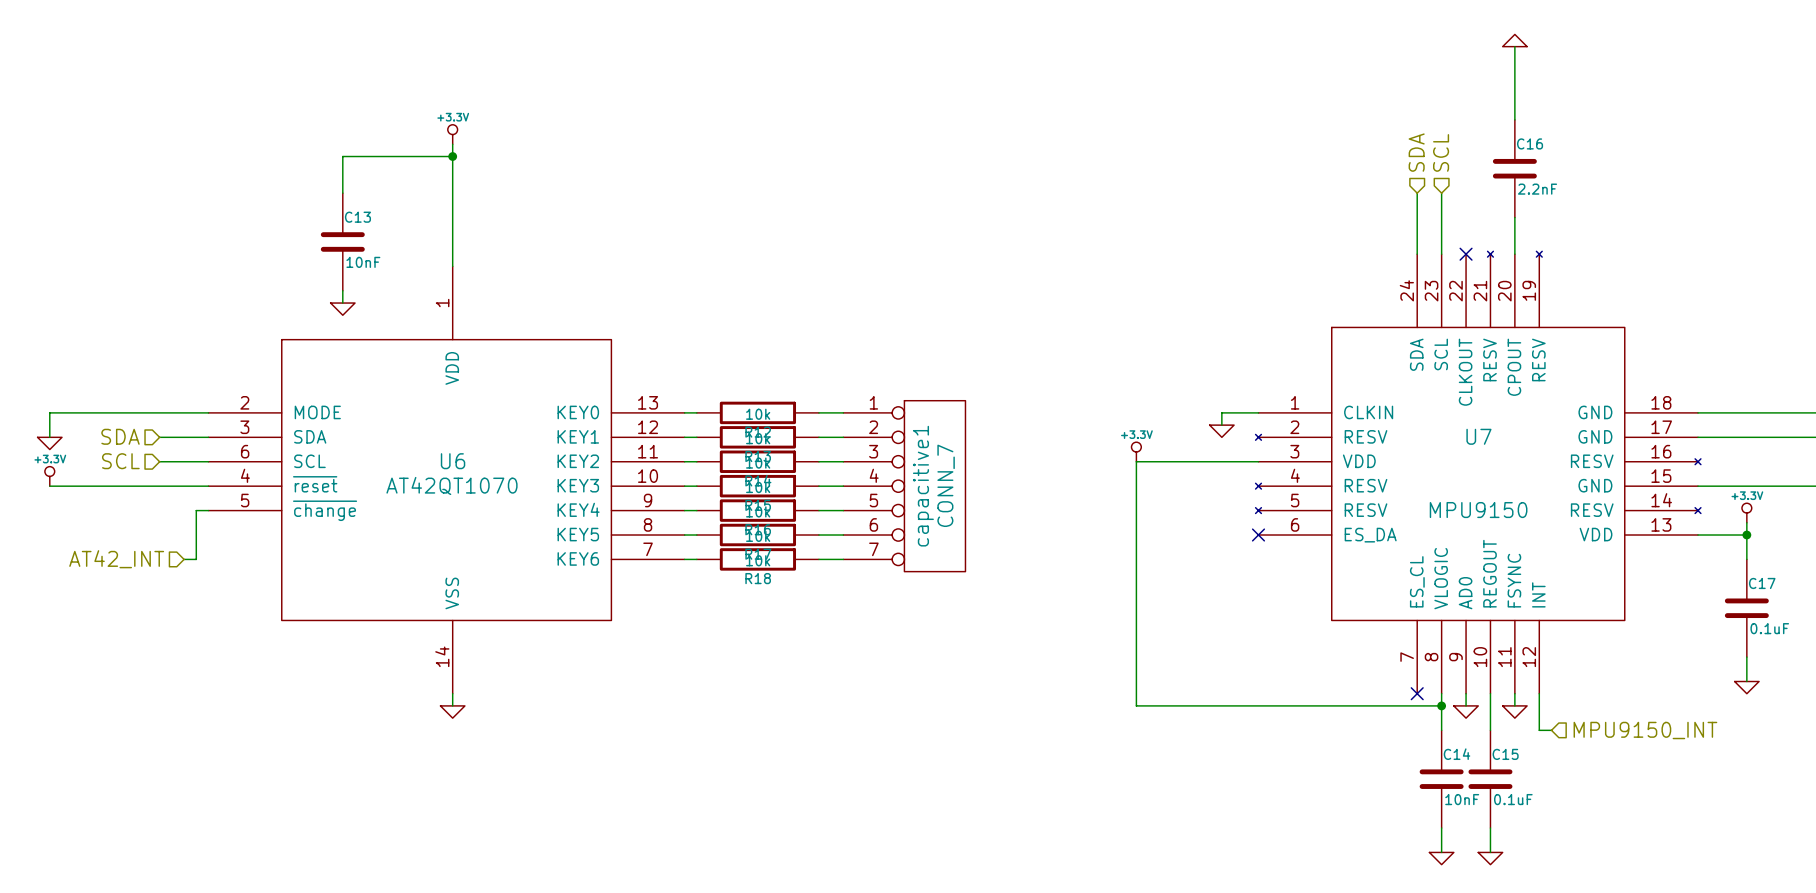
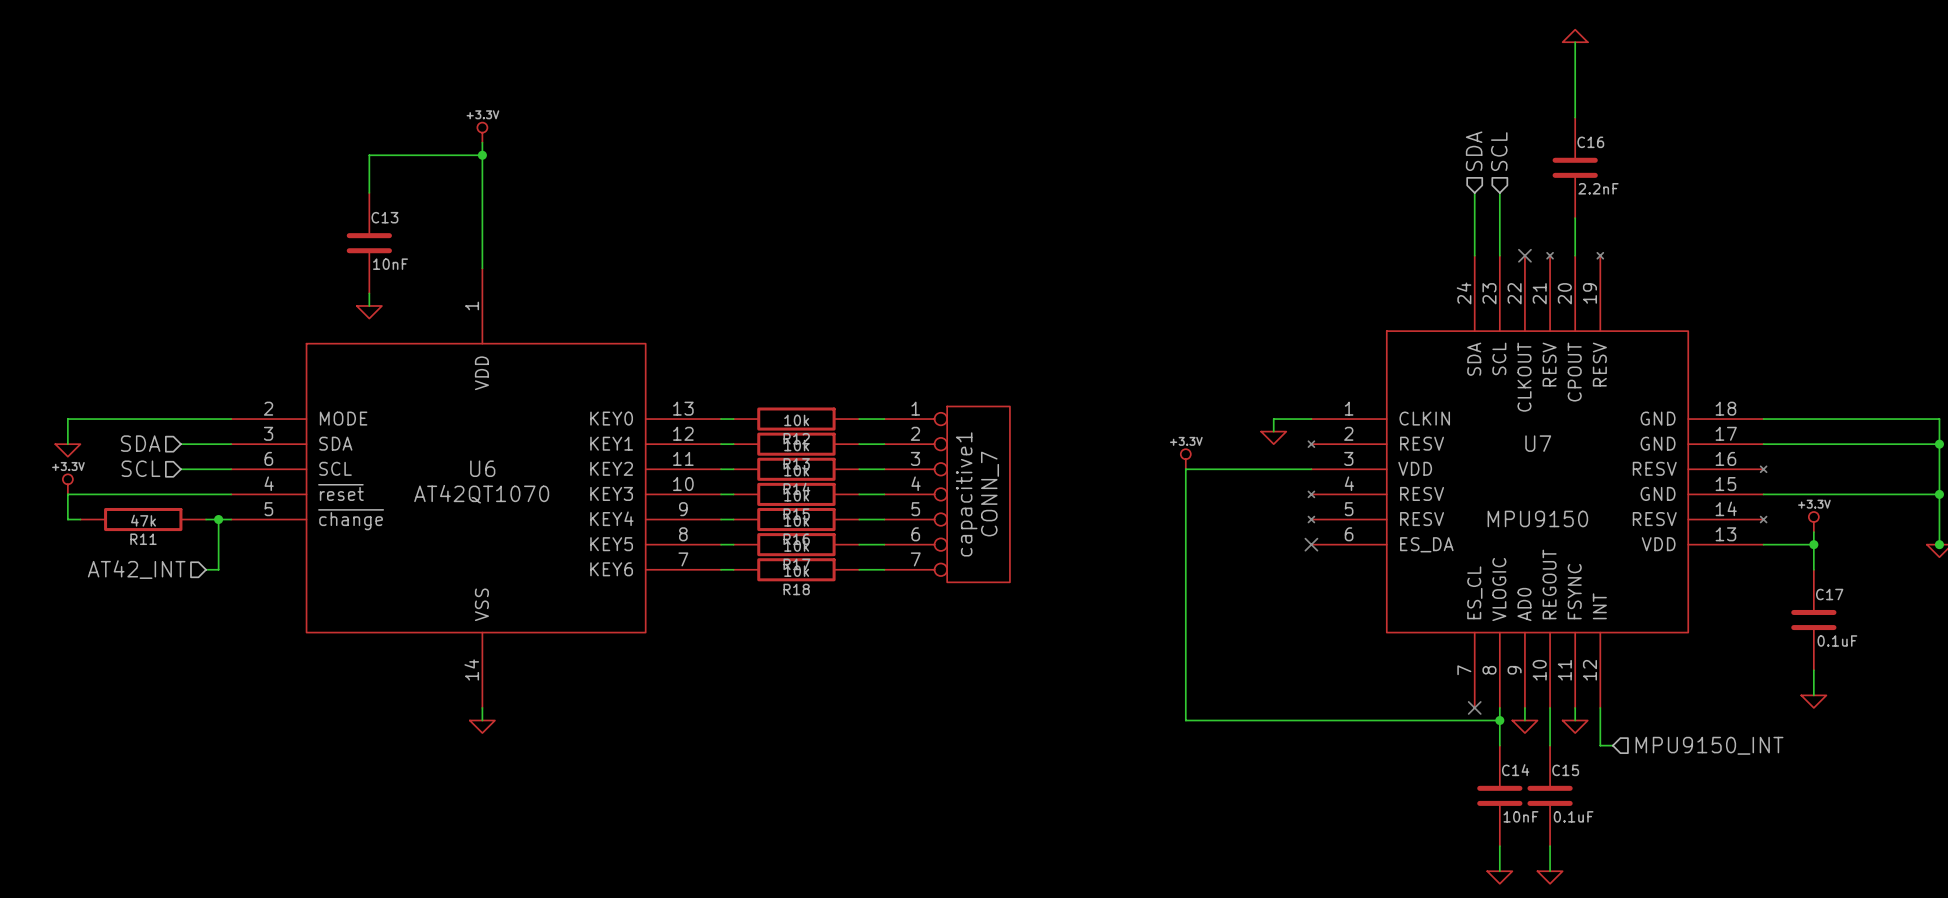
wire: none -> (67, 494) (67, 519) (80, 519)
R11: none -> 47k (143, 519)
wire: none -> (206, 519) (218, 519)
junction: none -> (218, 519)

